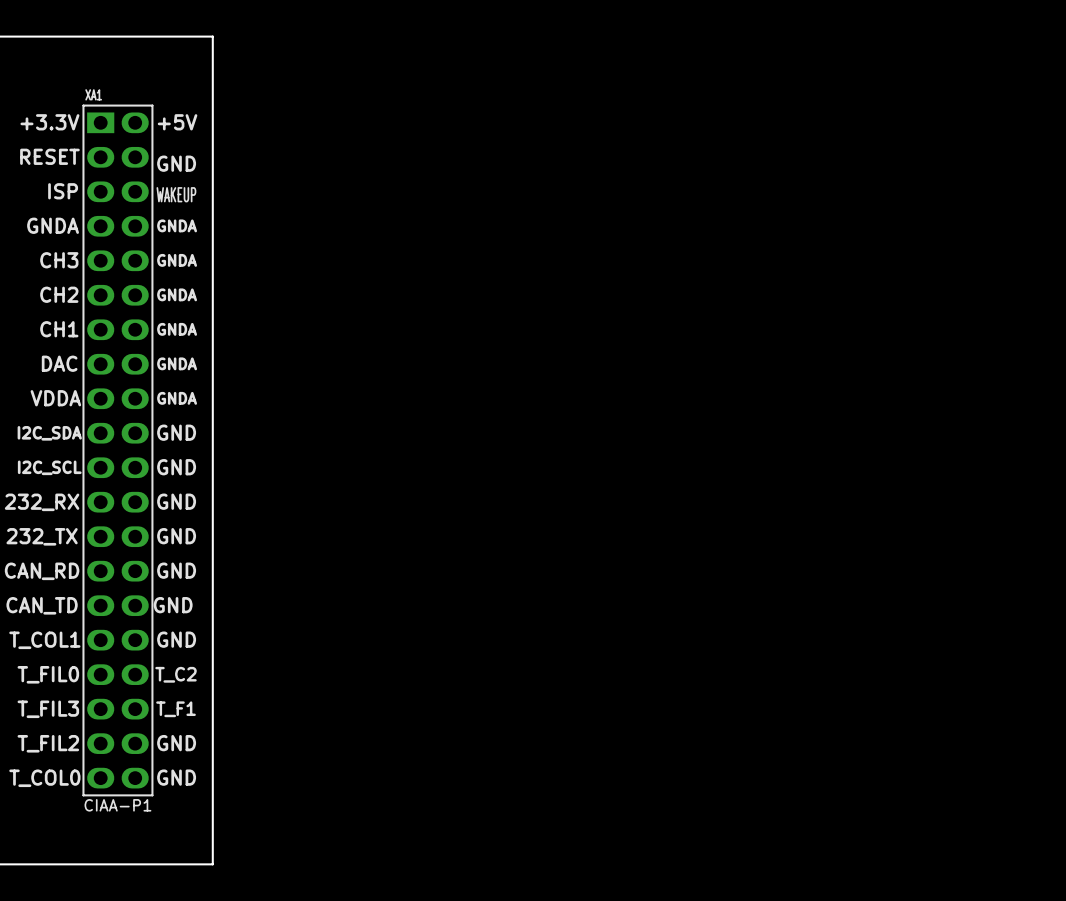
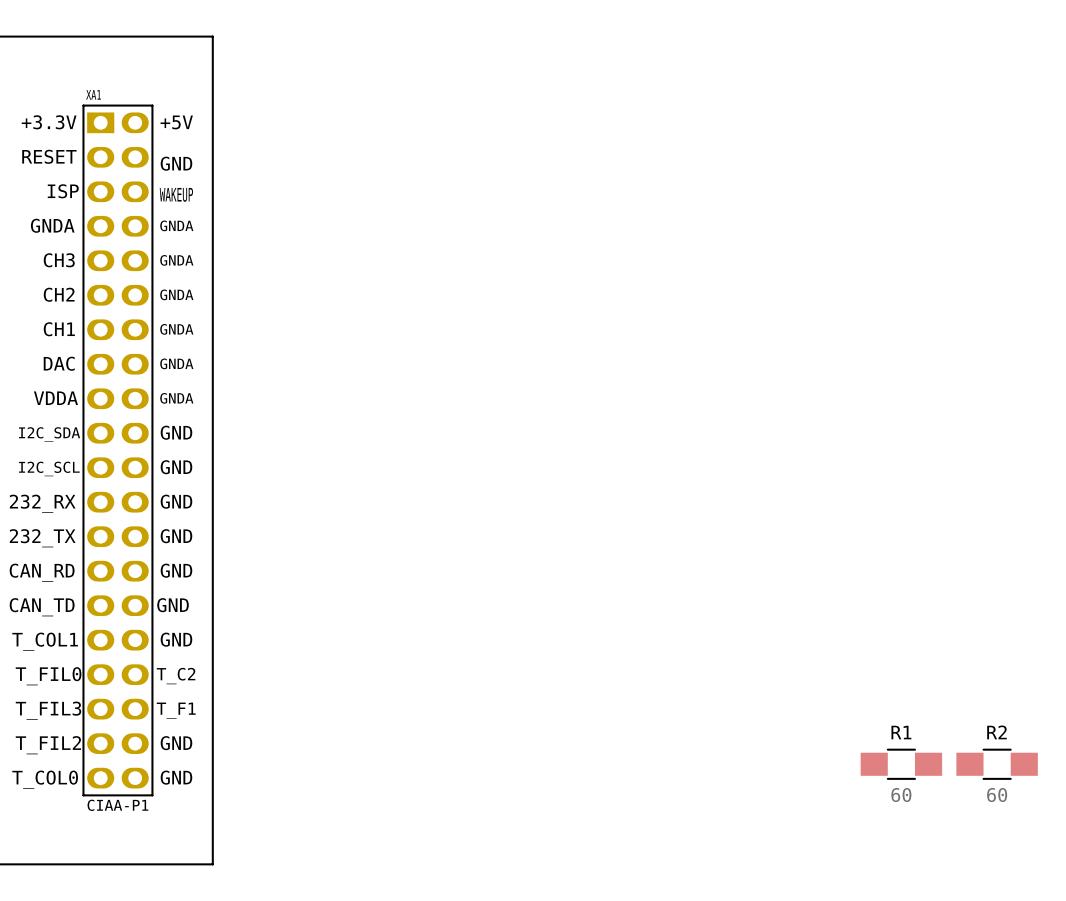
R1: none -> 60 (901, 764)
R2: none -> 60 (997, 764)

